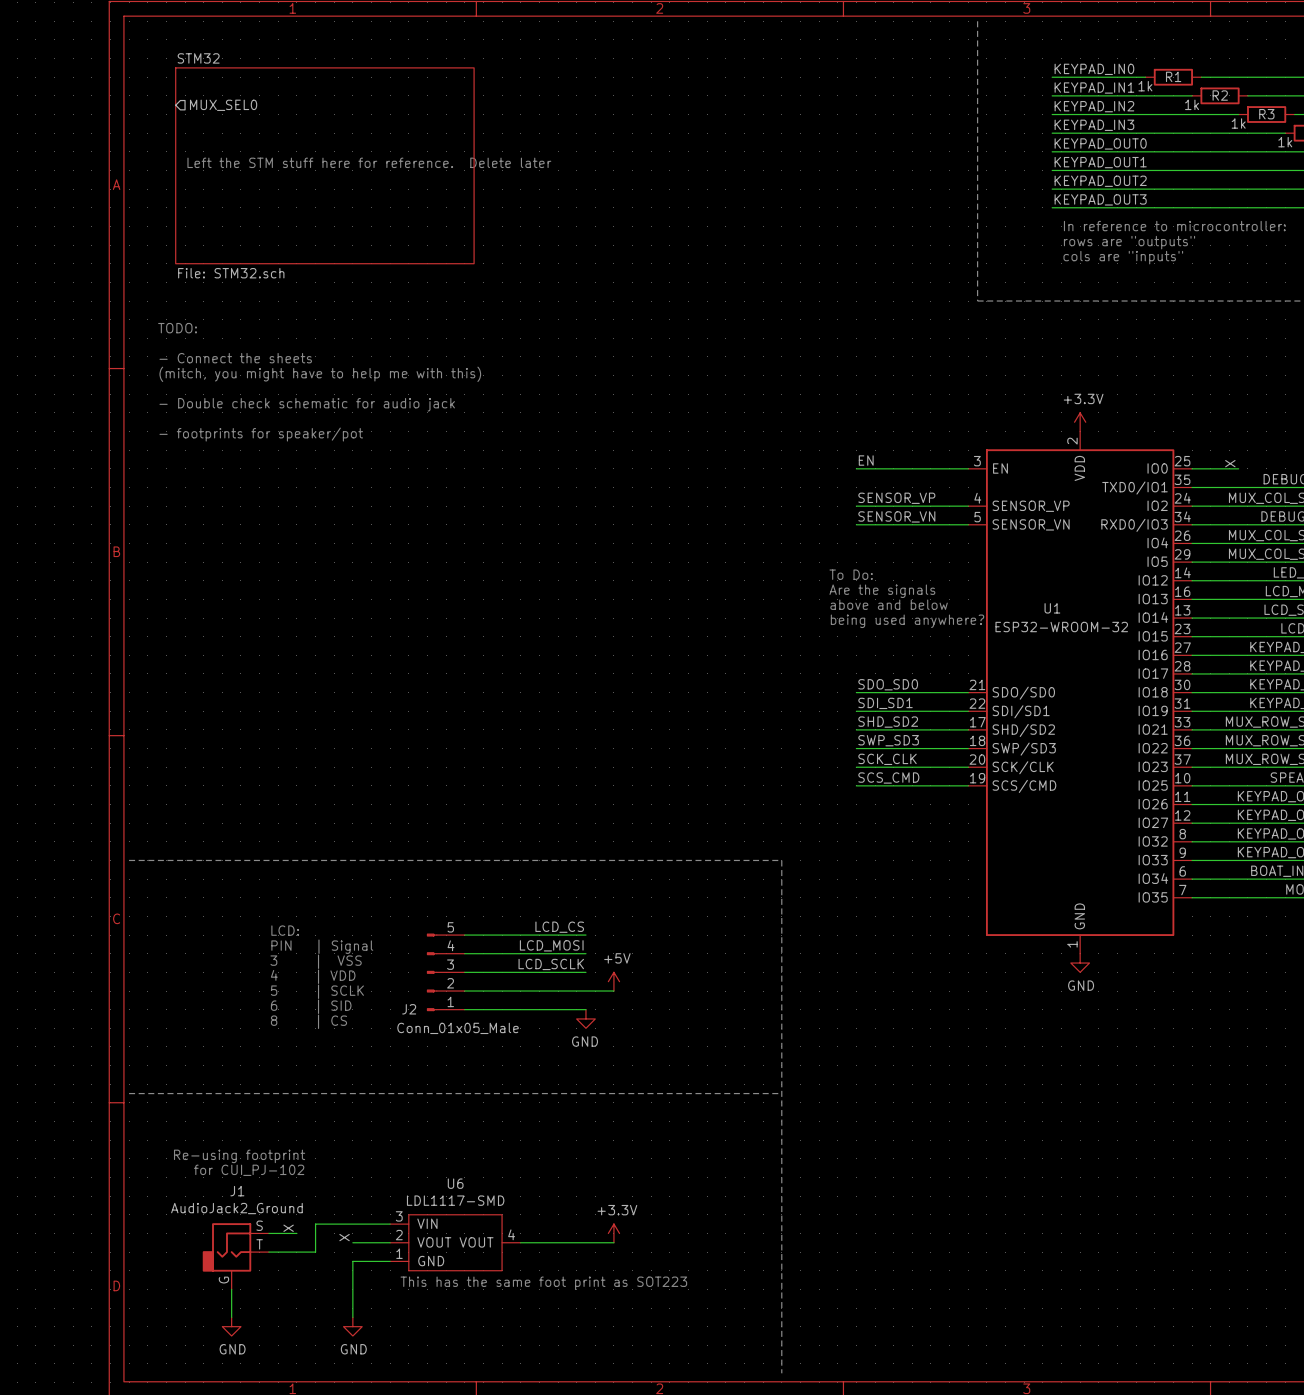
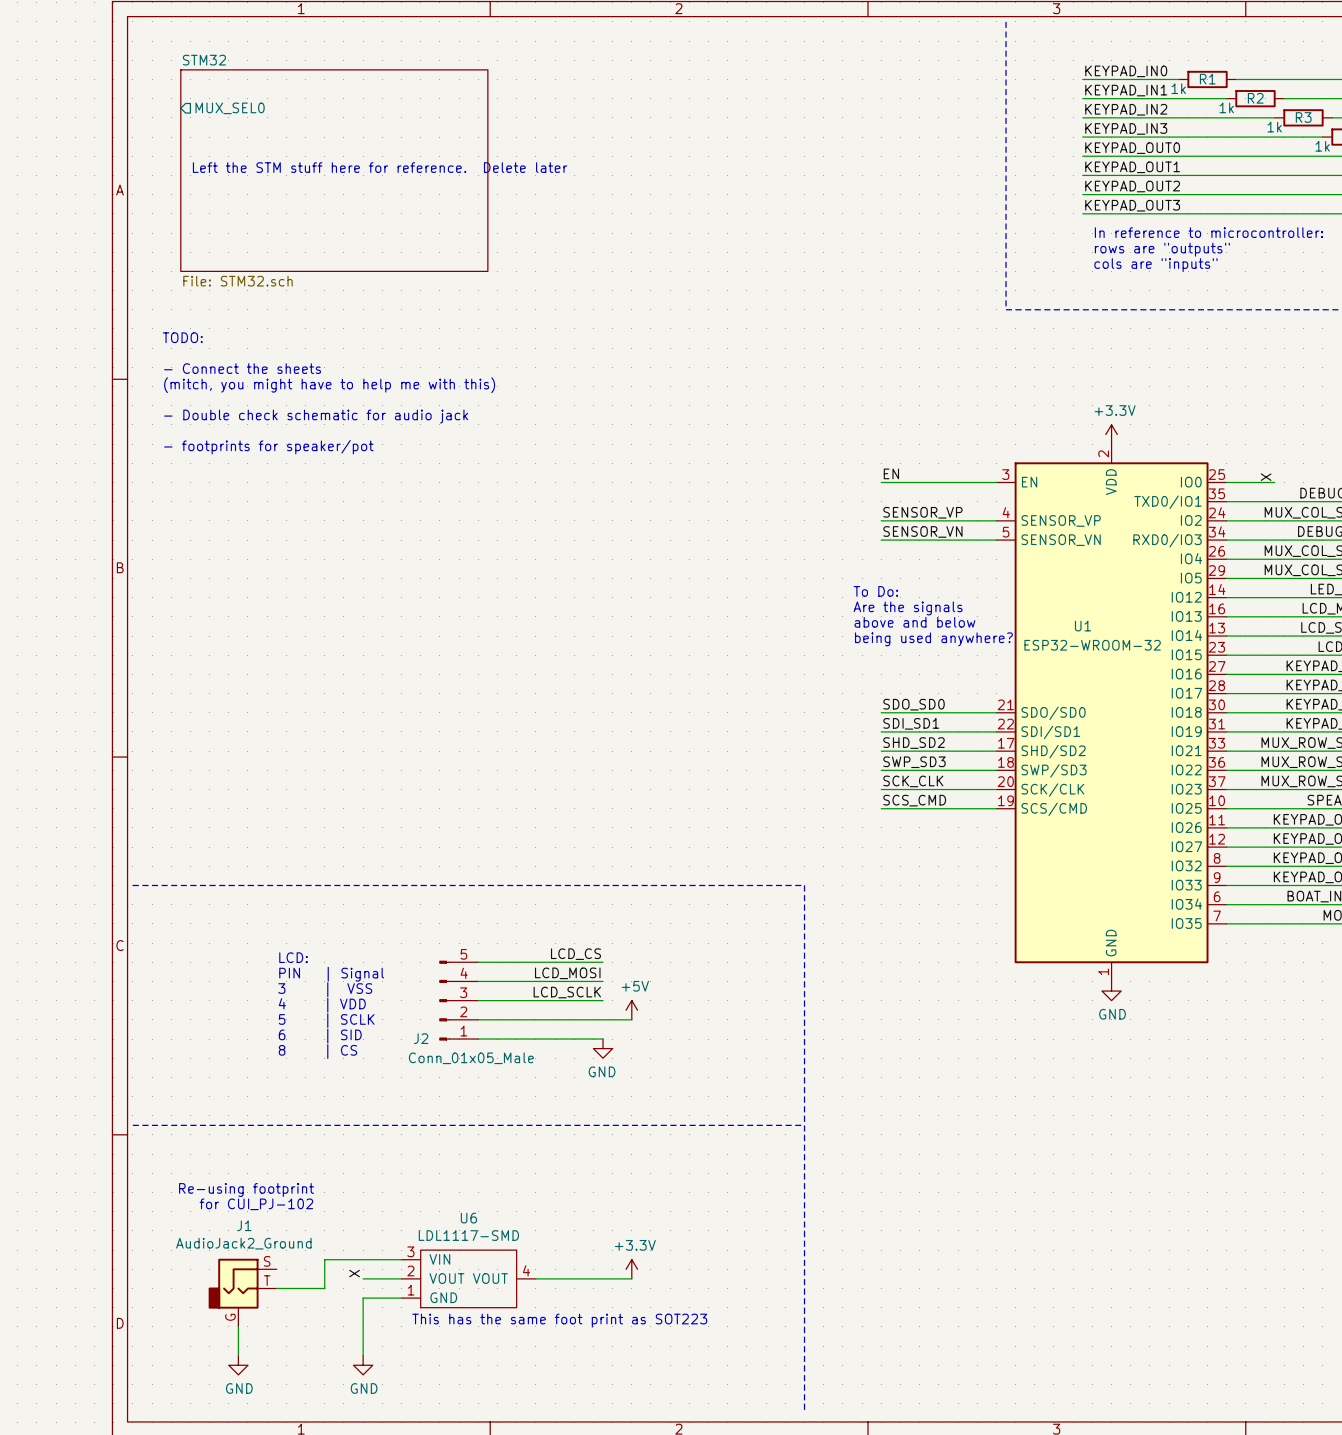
label: X (288, 1228) -> none
wire: (268, 1233) (296, 1233) -> none

